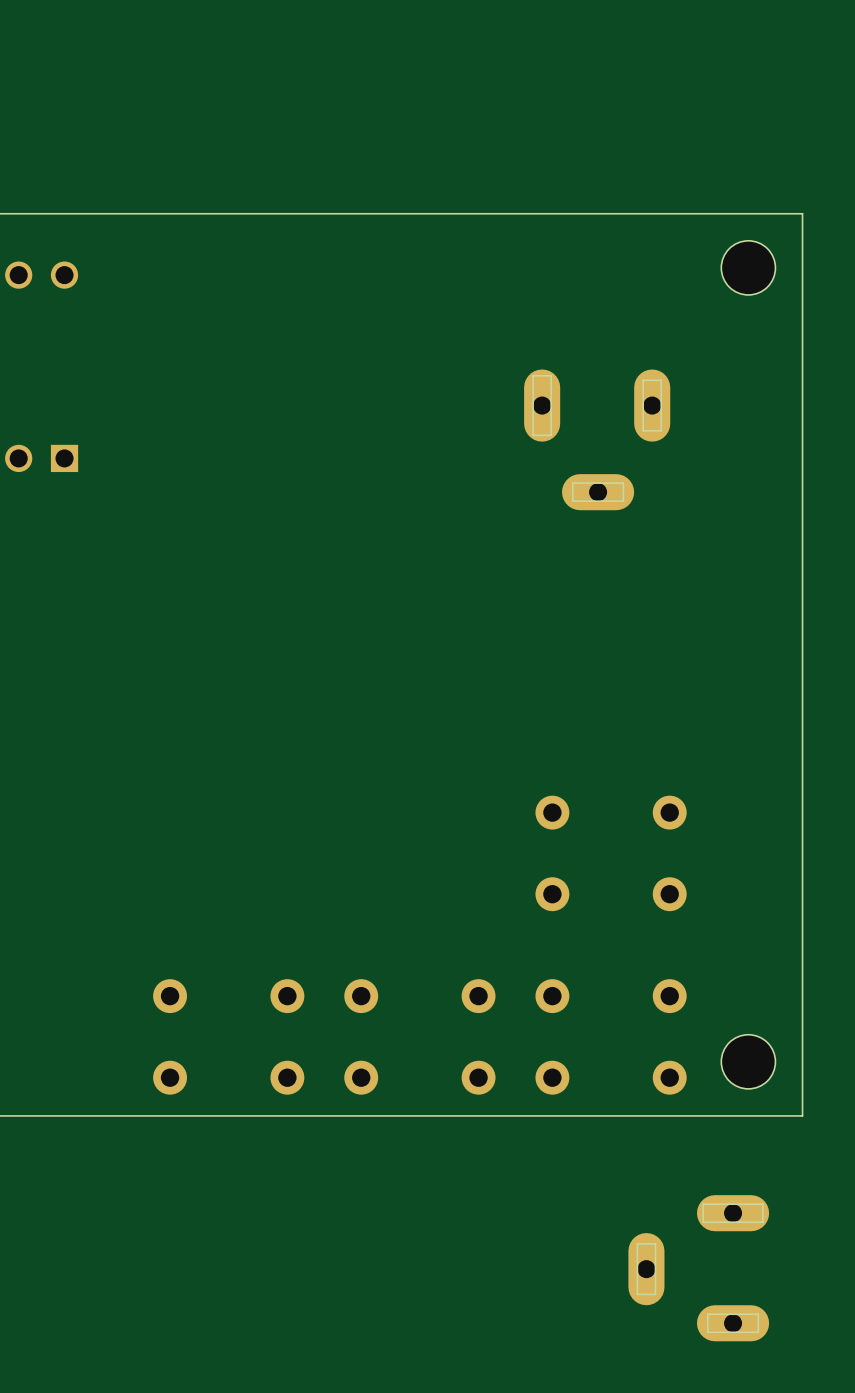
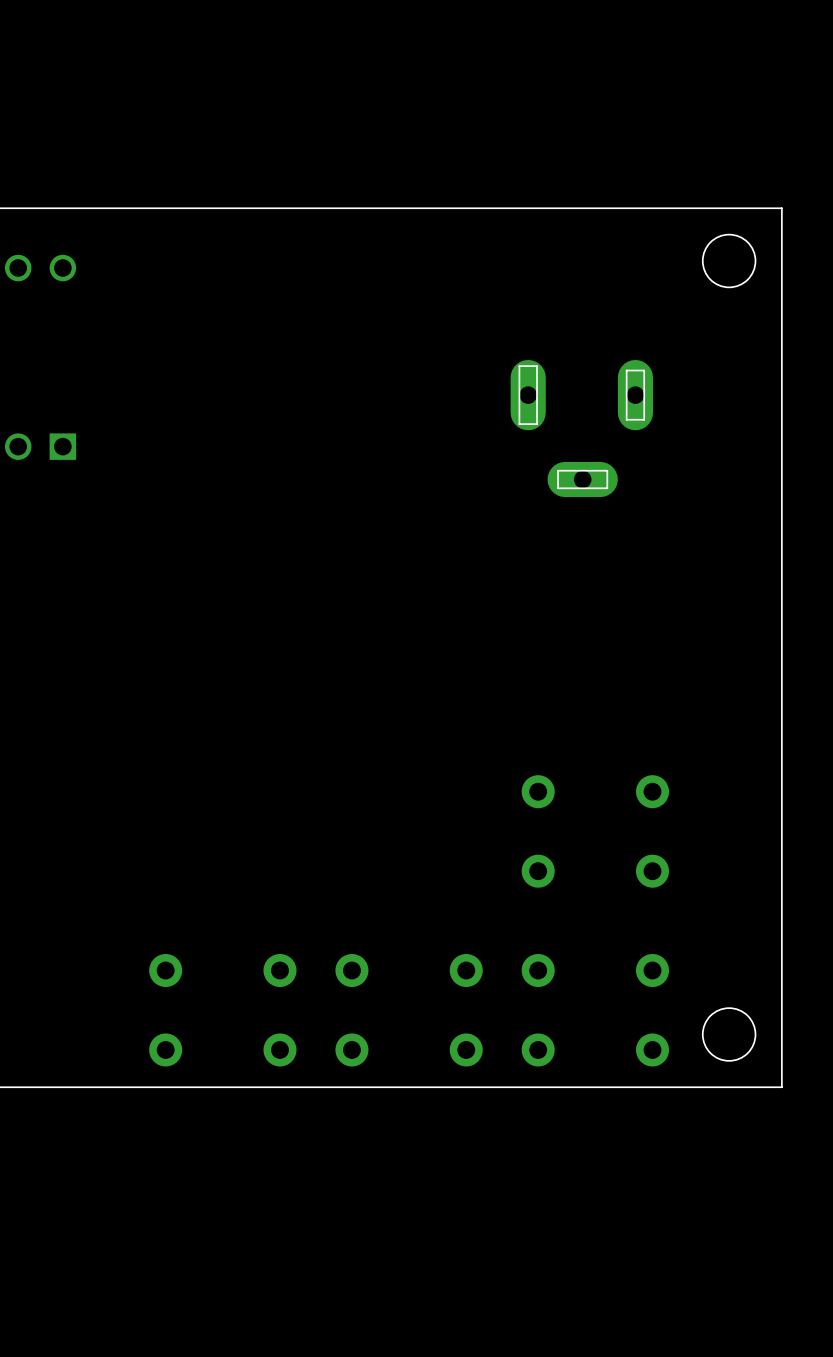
part: (698, 1268) -> none

